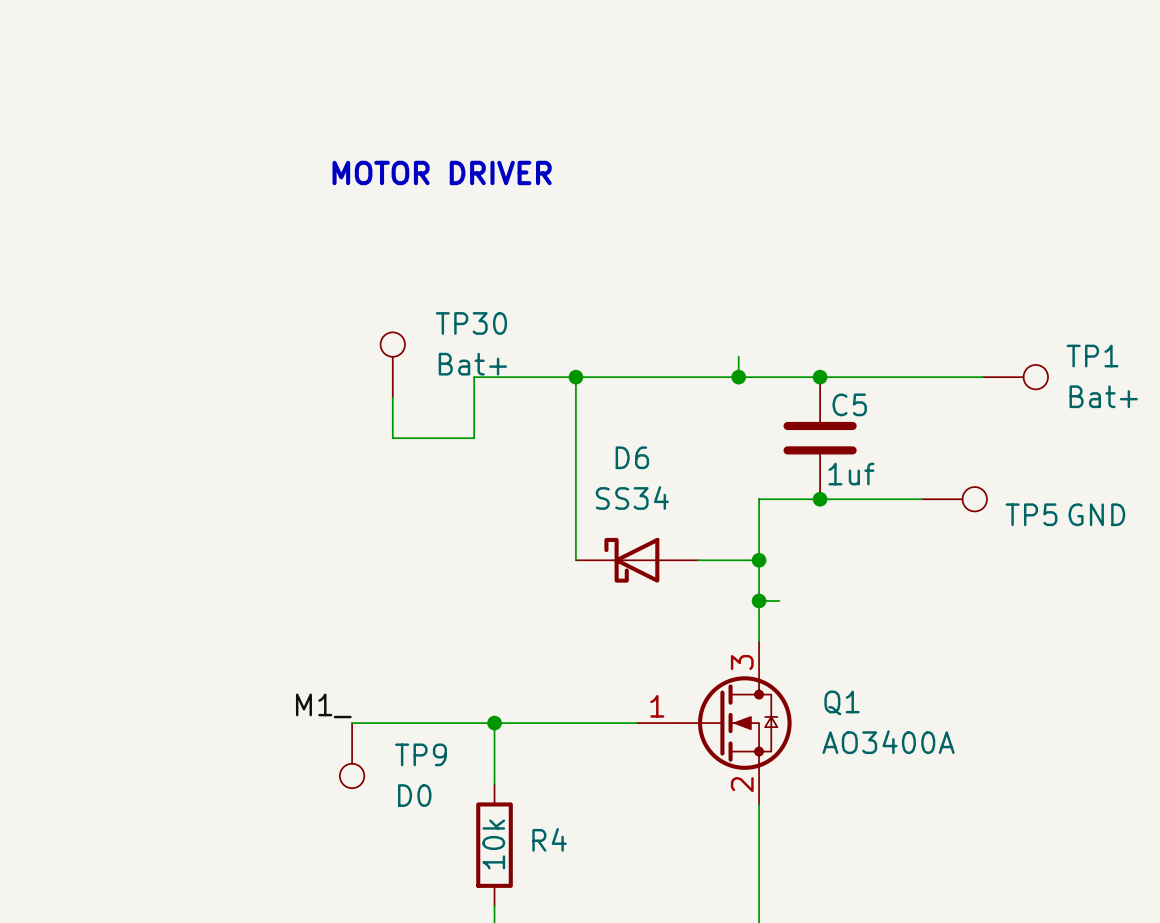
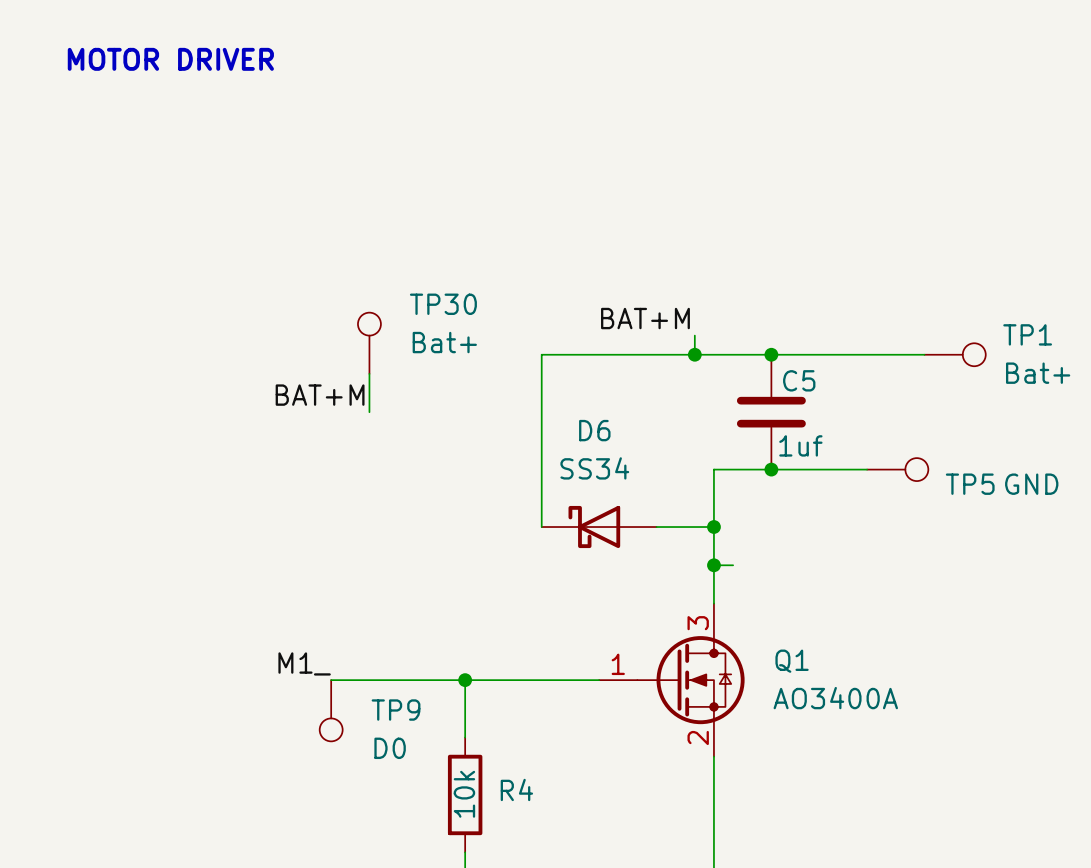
text position: MOTOR DRIVER (442, 172) -> MOTOR DRIVER (170, 59)
label: none -> BAT+M (645, 318)
wire: (575, 377) (474, 377) (474, 438) (392, 438) -> none
junction: (575, 377) -> none
label: none -> BAT+M (320, 395)

